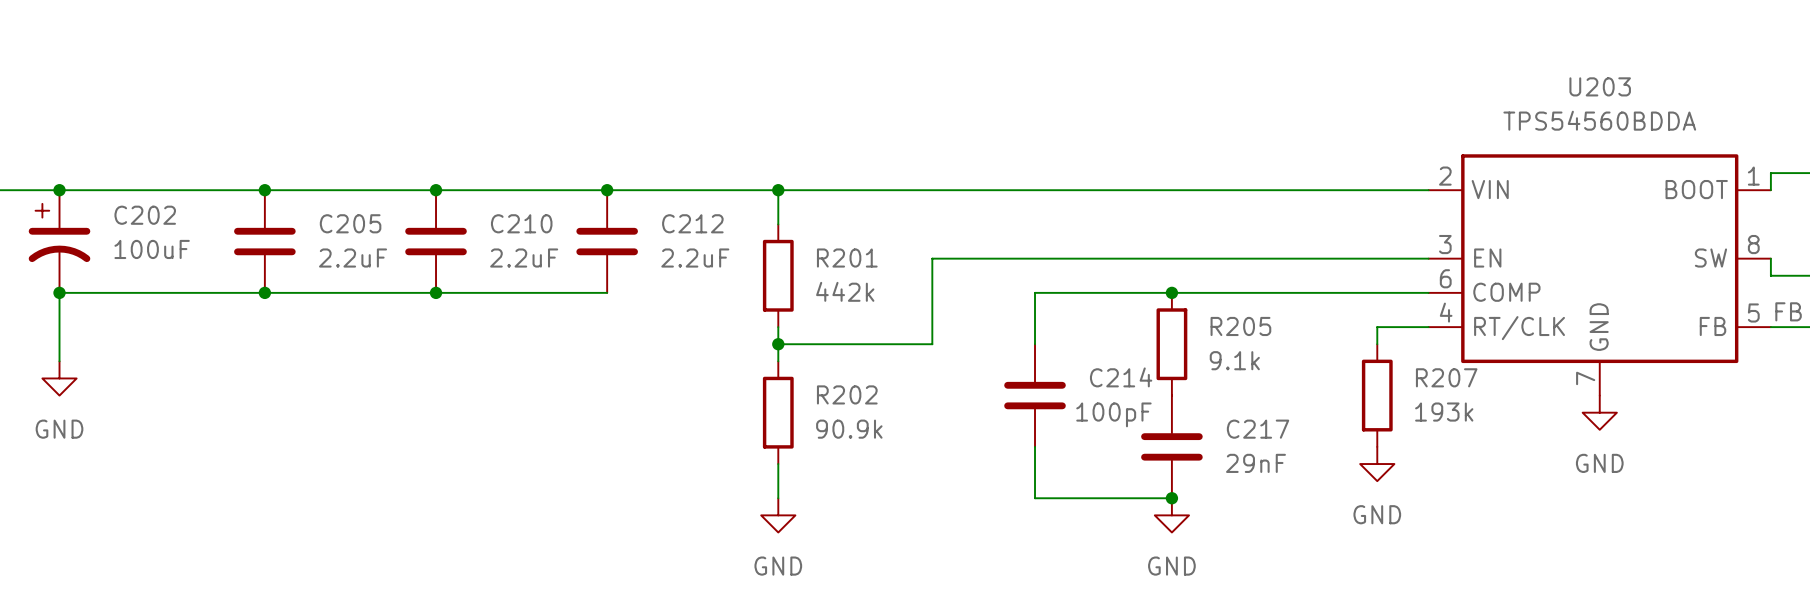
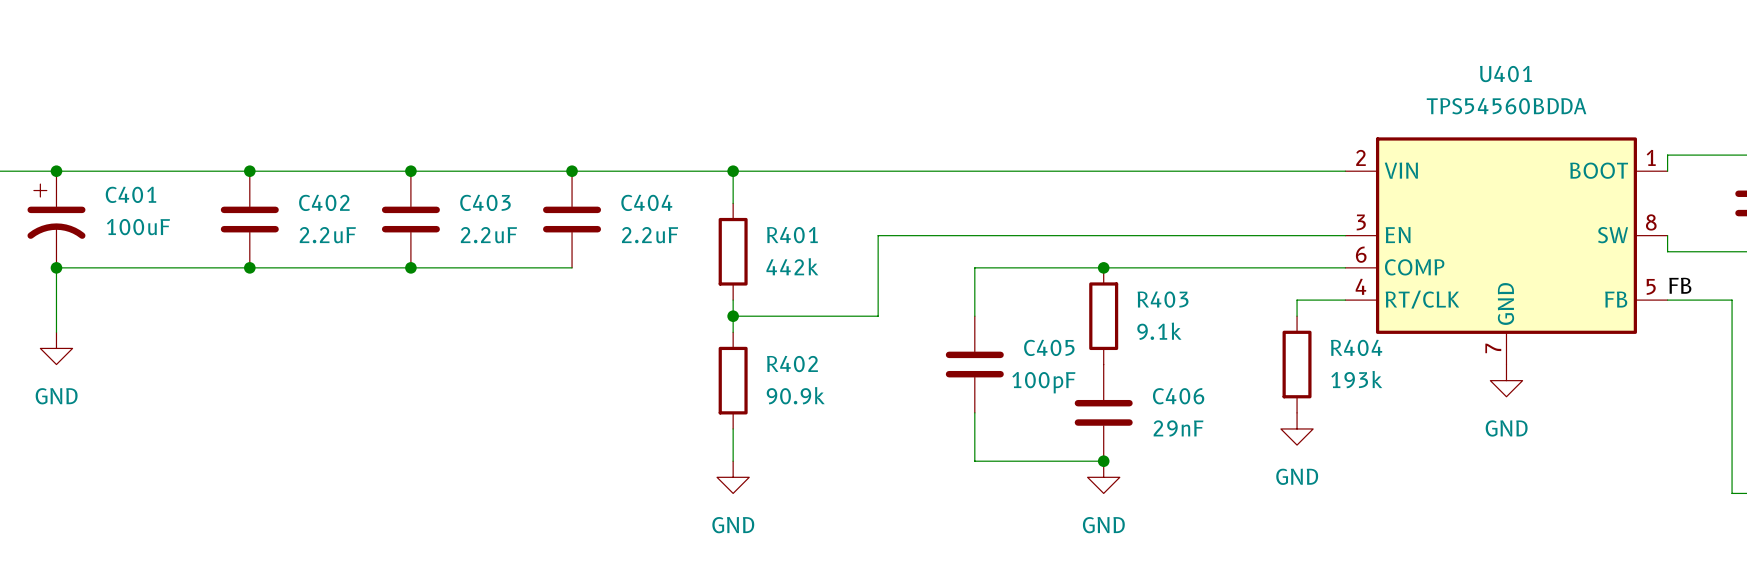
U203 name: U203 (1600, 86) -> U401 (1505, 74)
C202 name: C202 (145, 215) -> C401 (130, 194)
C205 name: C205 (350, 223) -> C402 (324, 202)
C210 name: C210 (521, 223) -> C403 (485, 202)
C212 name: C212 (692, 223) -> C404 (646, 202)
R201 name: R201 (847, 258) -> R401 (792, 235)
R205 name: R205 (1240, 326) -> R403 (1163, 299)
C214 name: C214 (1121, 377) -> C405 (1049, 347)
R207 name: R207 (1446, 377) -> R404 (1356, 347)
R202 name: R202 (847, 394) -> R402 (792, 364)
C217 name: C217 (1258, 429) -> C406 (1178, 396)

